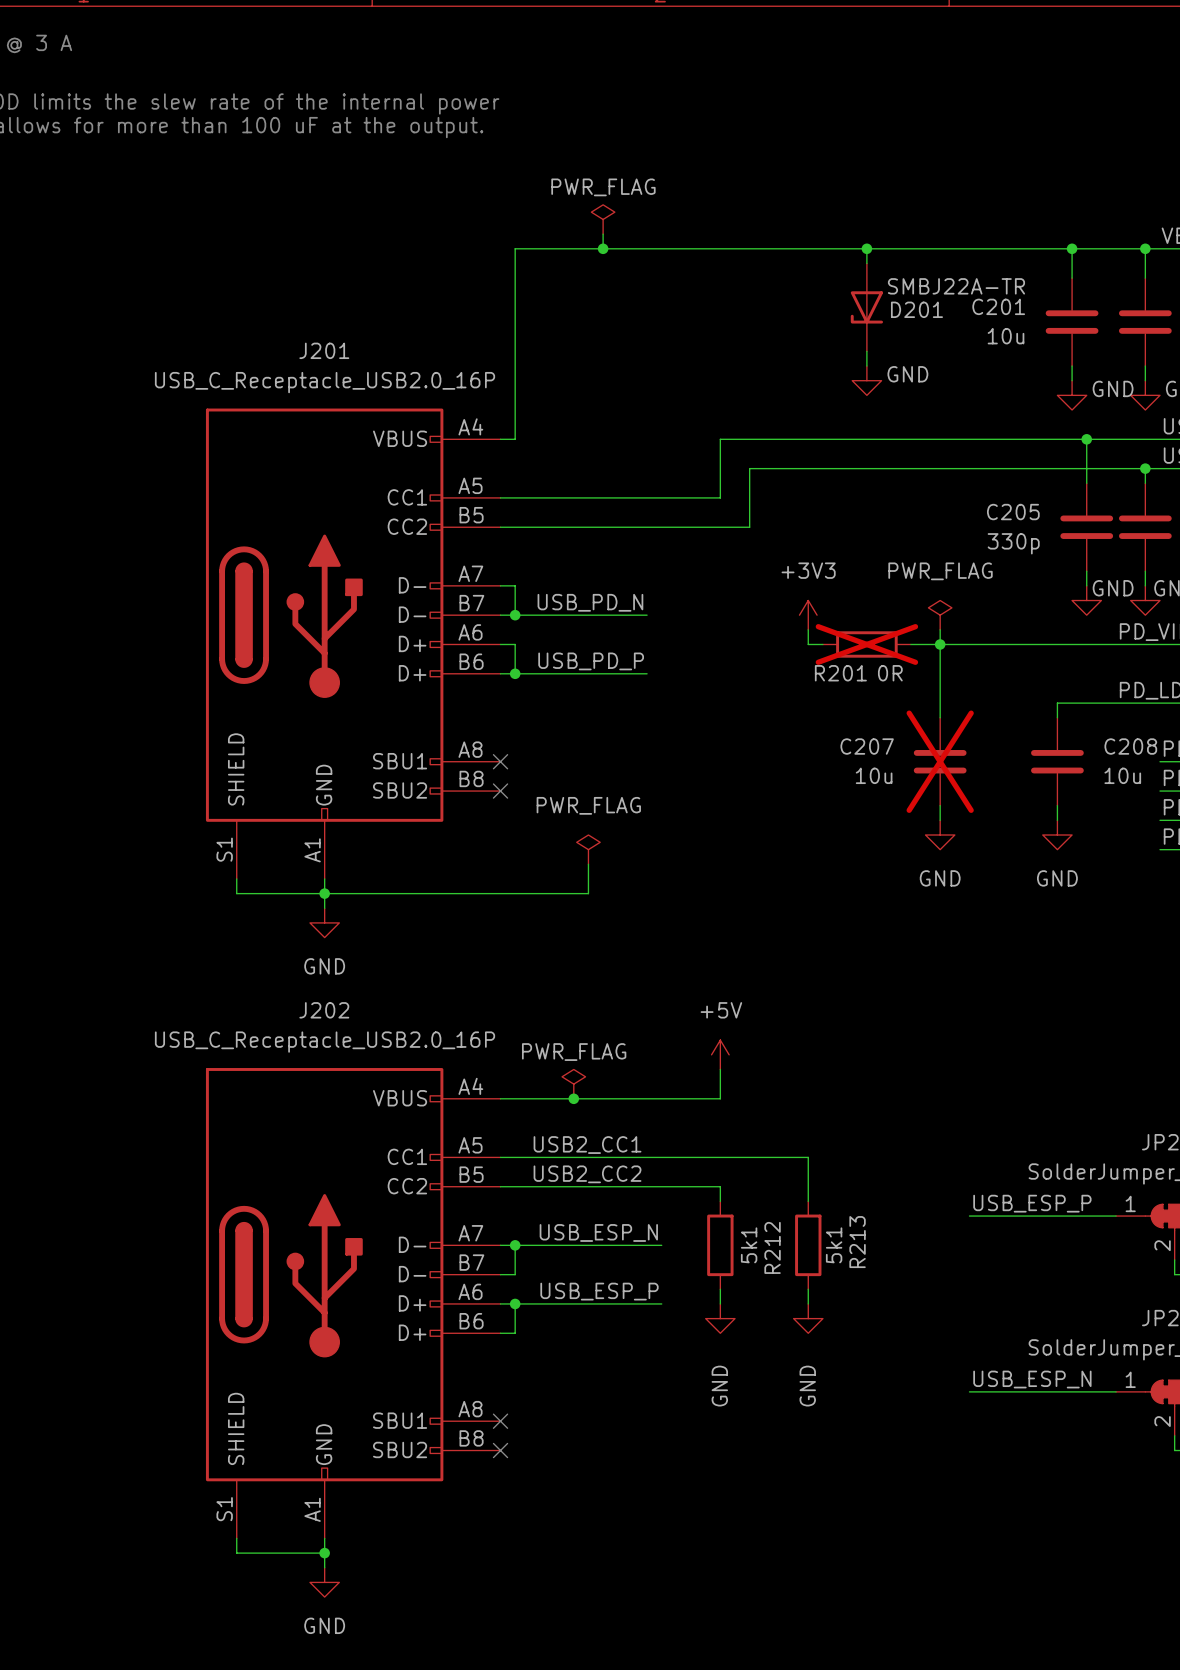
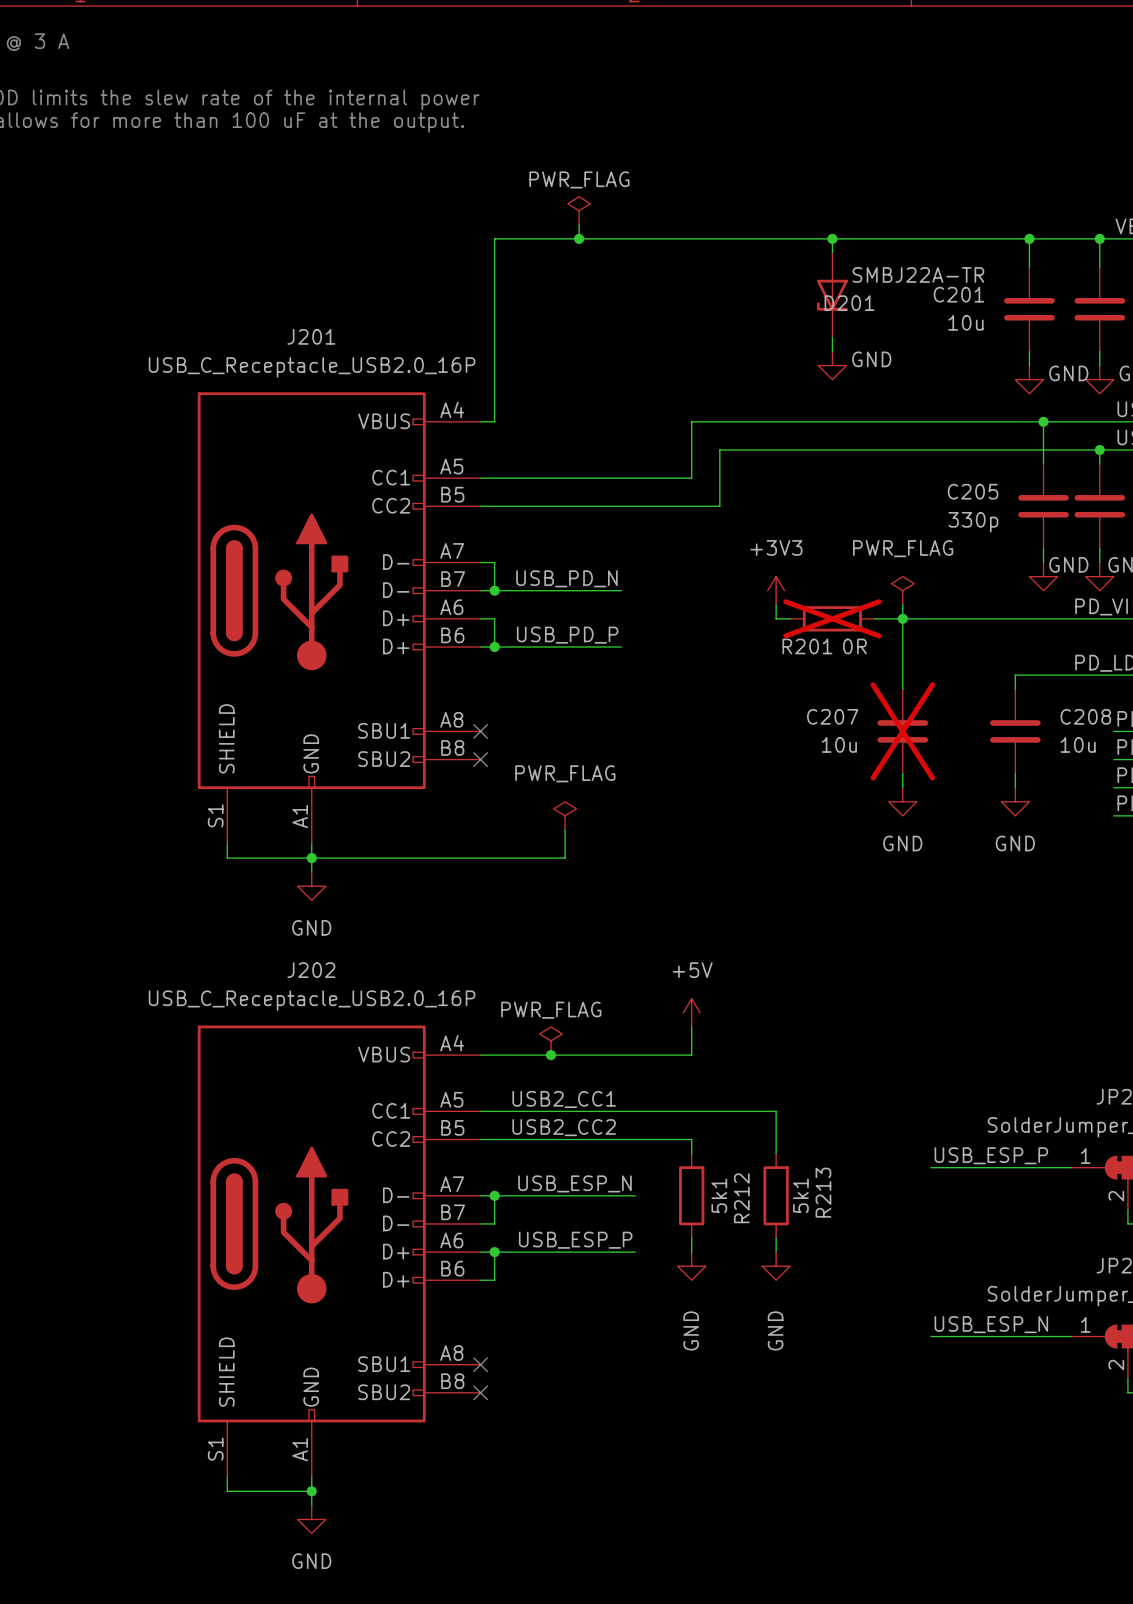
D201 name position: D201 (916, 309) -> D201 (849, 303)

